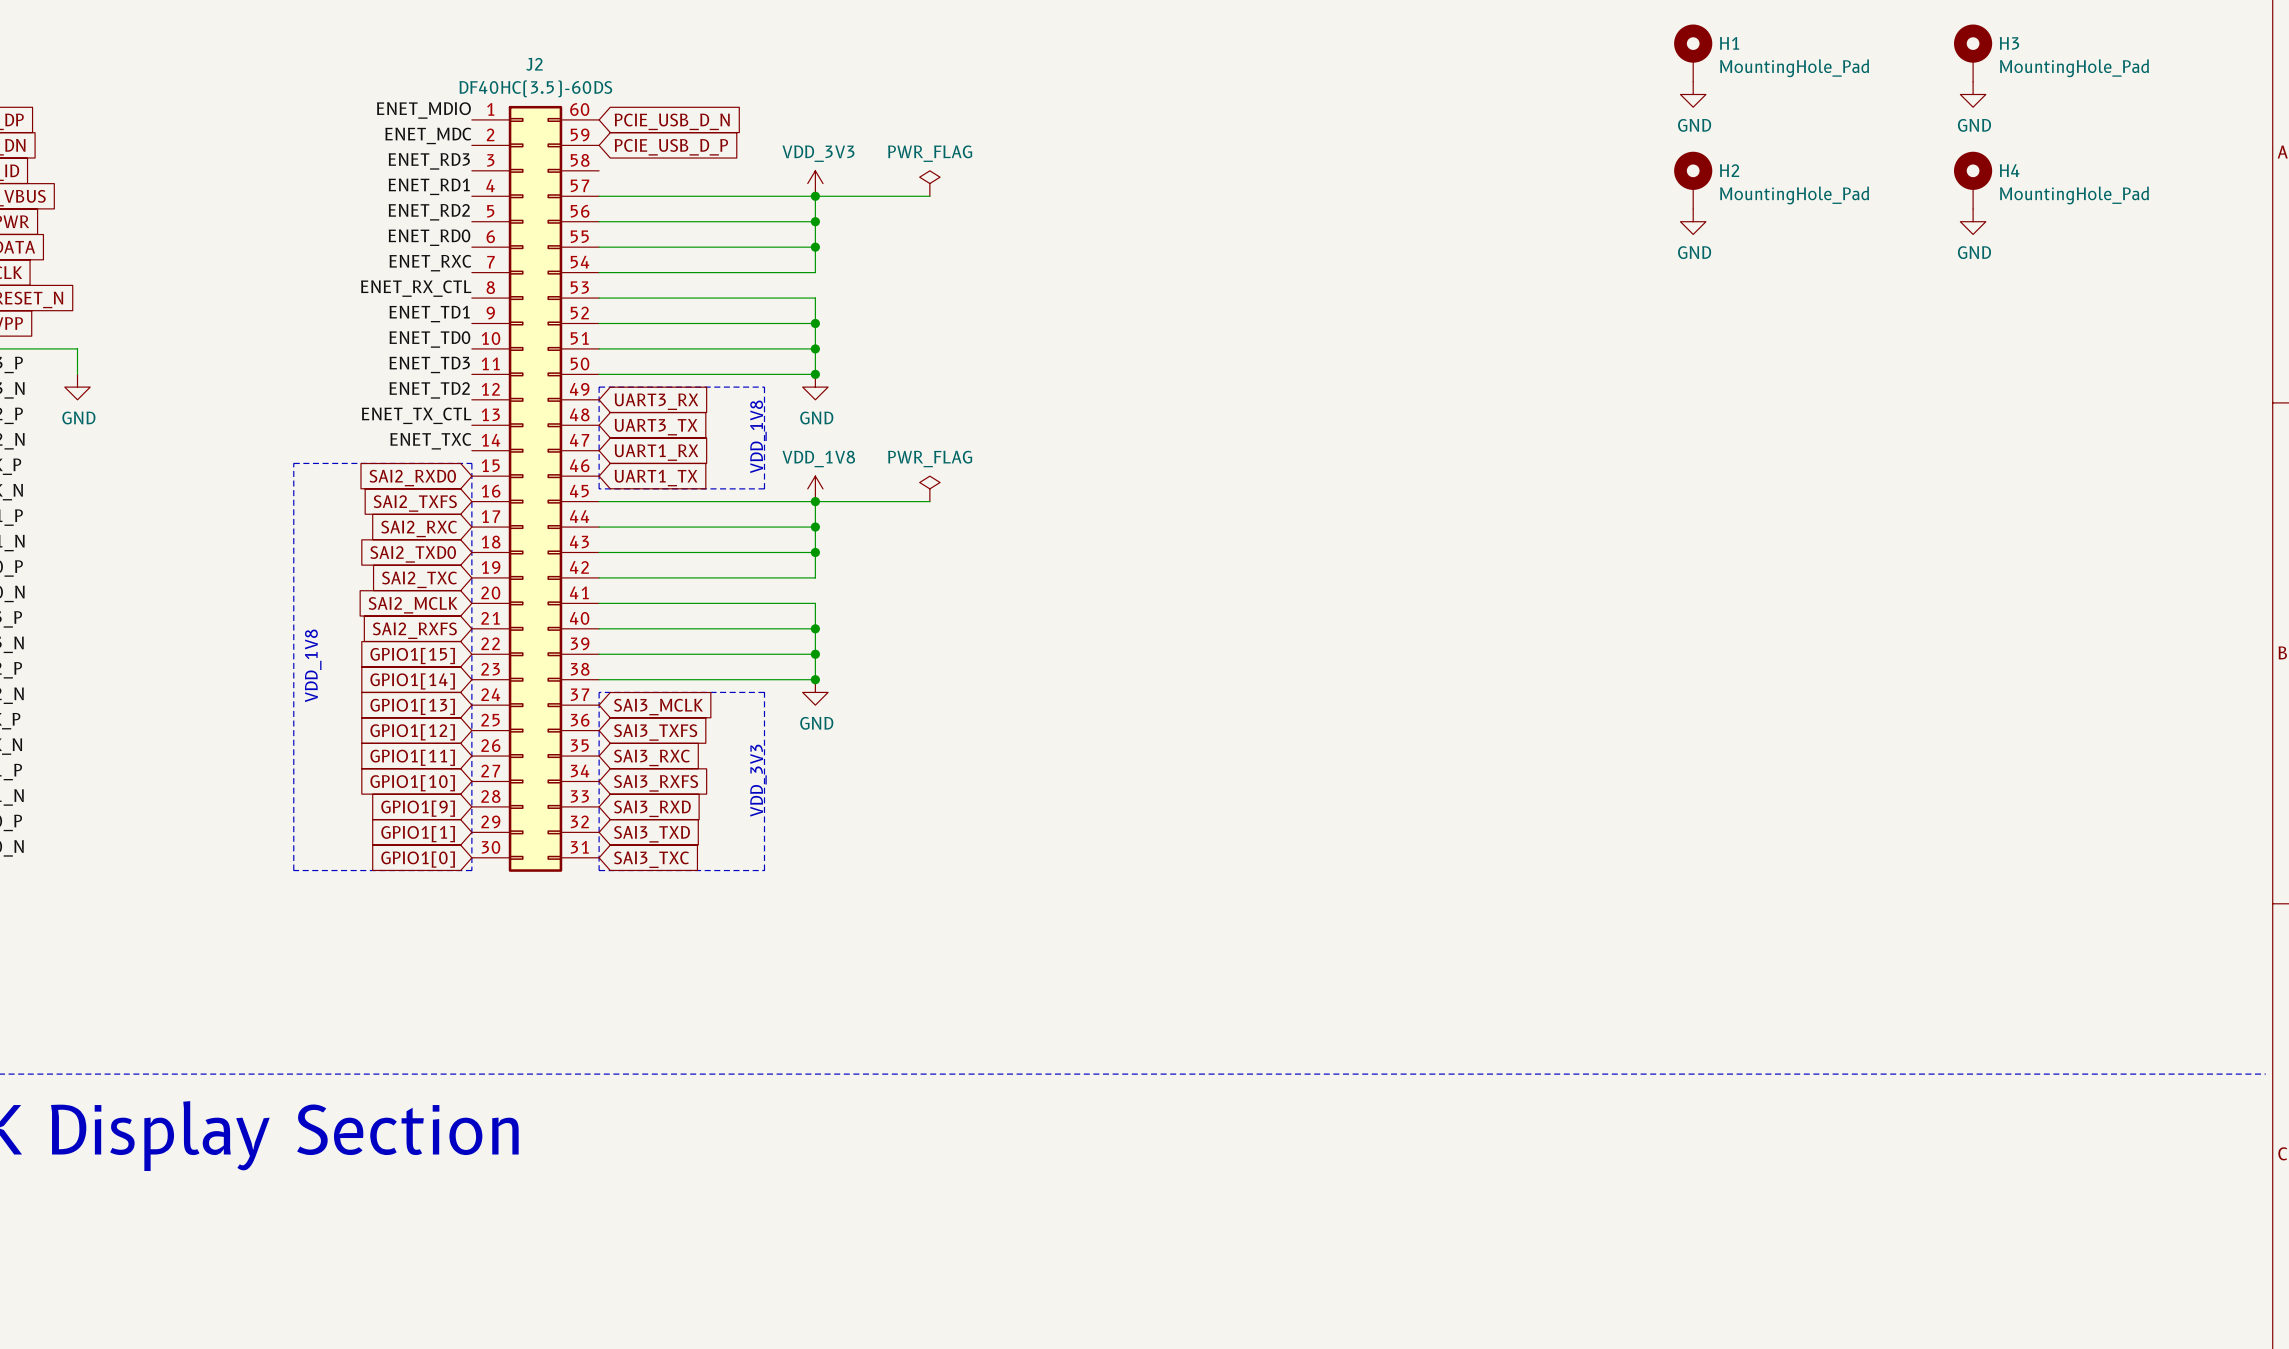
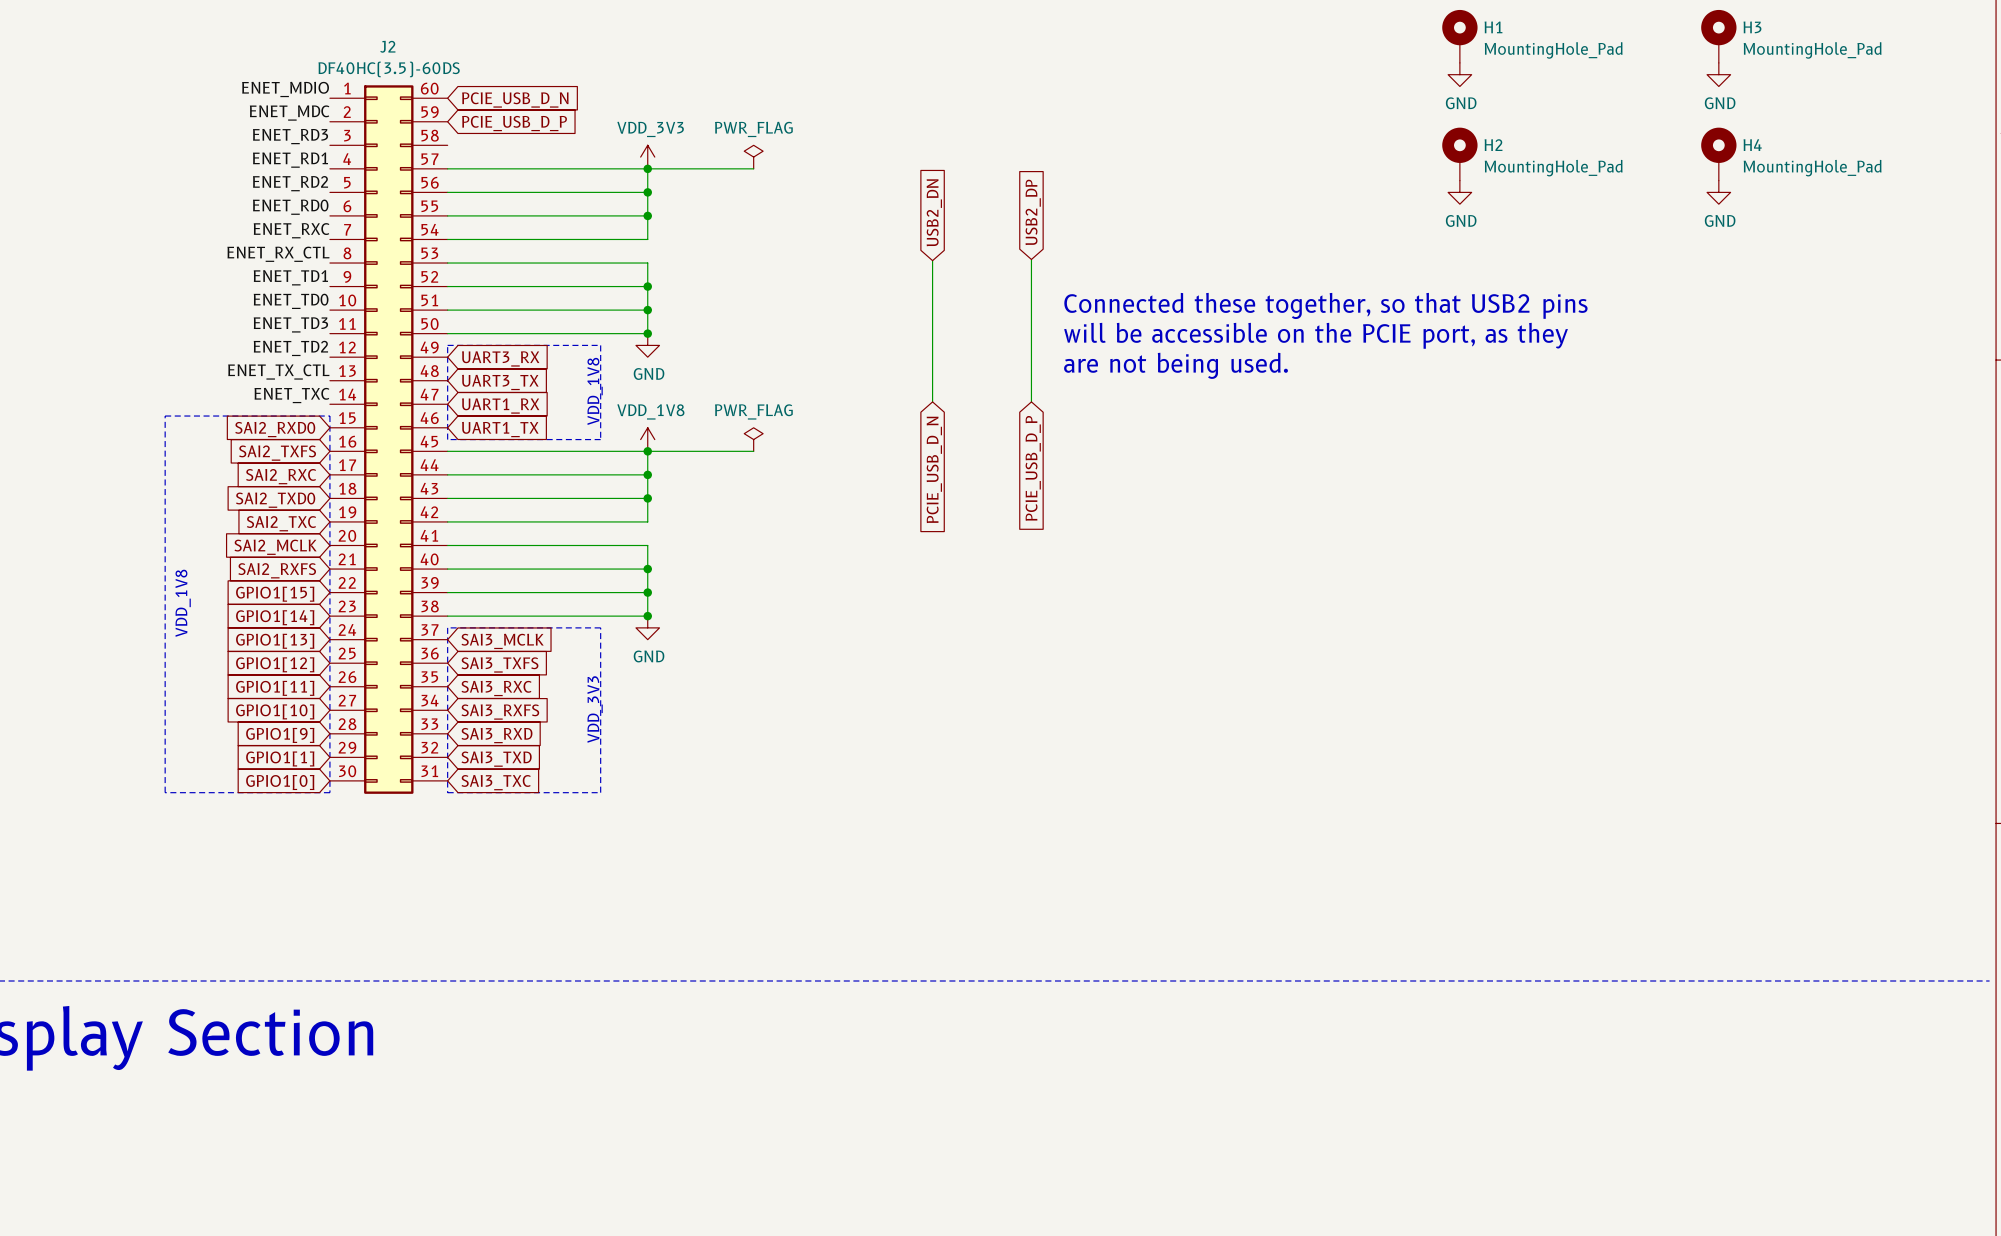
global label: none -> USB2_DN (934, 212)
global label: none -> USB2_DP (1033, 212)
wire: none -> (1031, 259) (1031, 401)
wire: none -> (932, 260) (932, 401)
text: none -> Connected these together, so that USB2 pins (1325, 305)
text: none -> will be accessible on the PCIE port, as they (1316, 335)
text: none -> are not being used. (1176, 365)
global label: none -> PCIE_USB_D_P (1033, 468)
global label: none -> PCIE_USB_D_N (934, 469)

